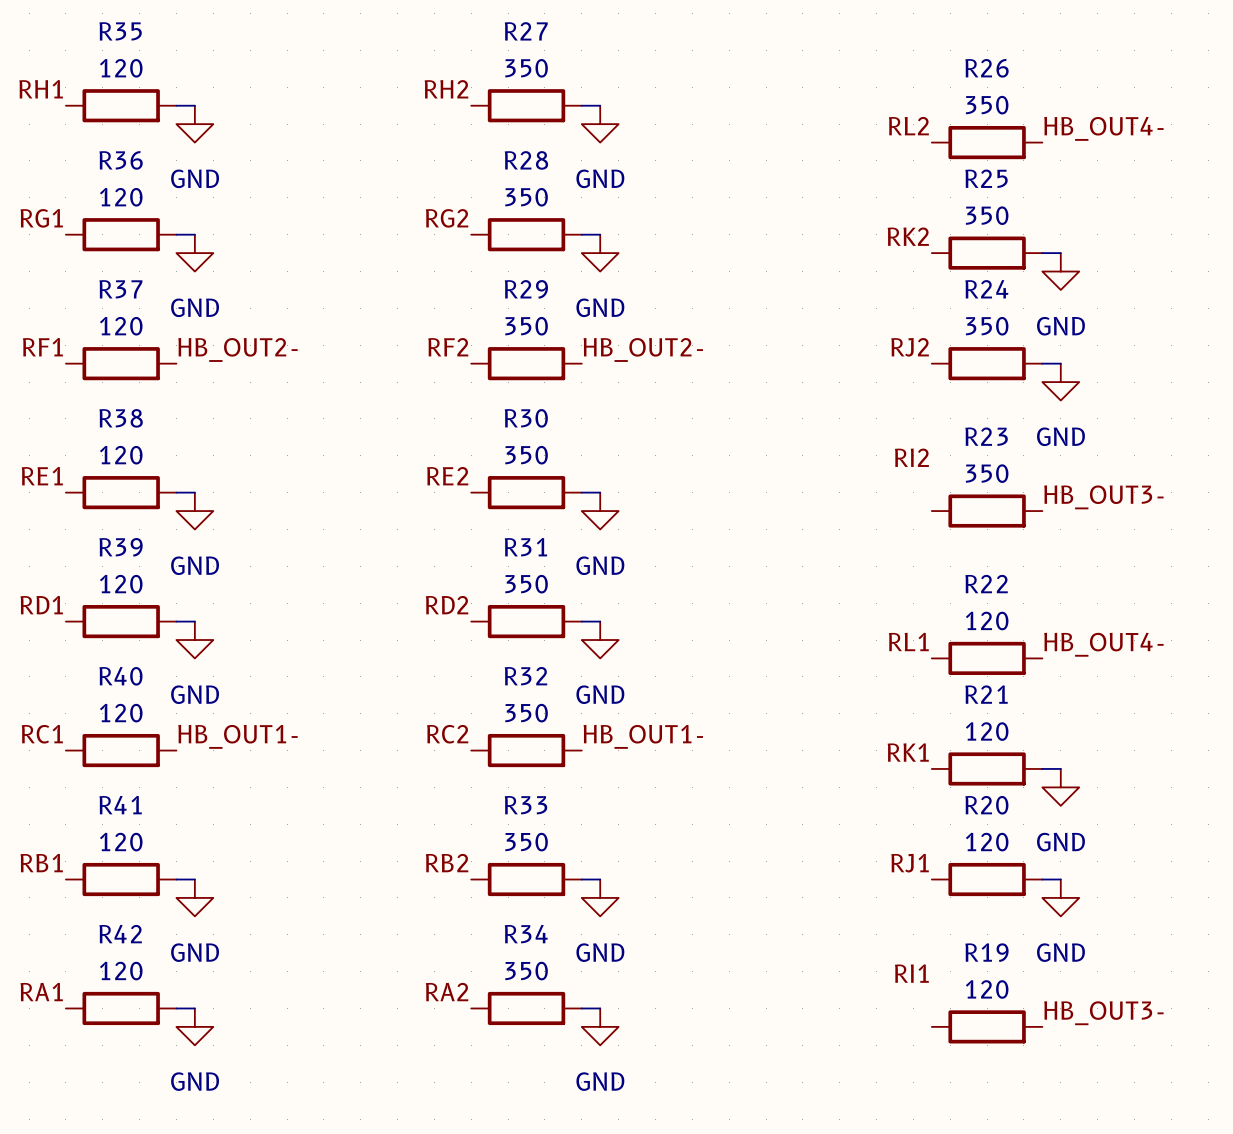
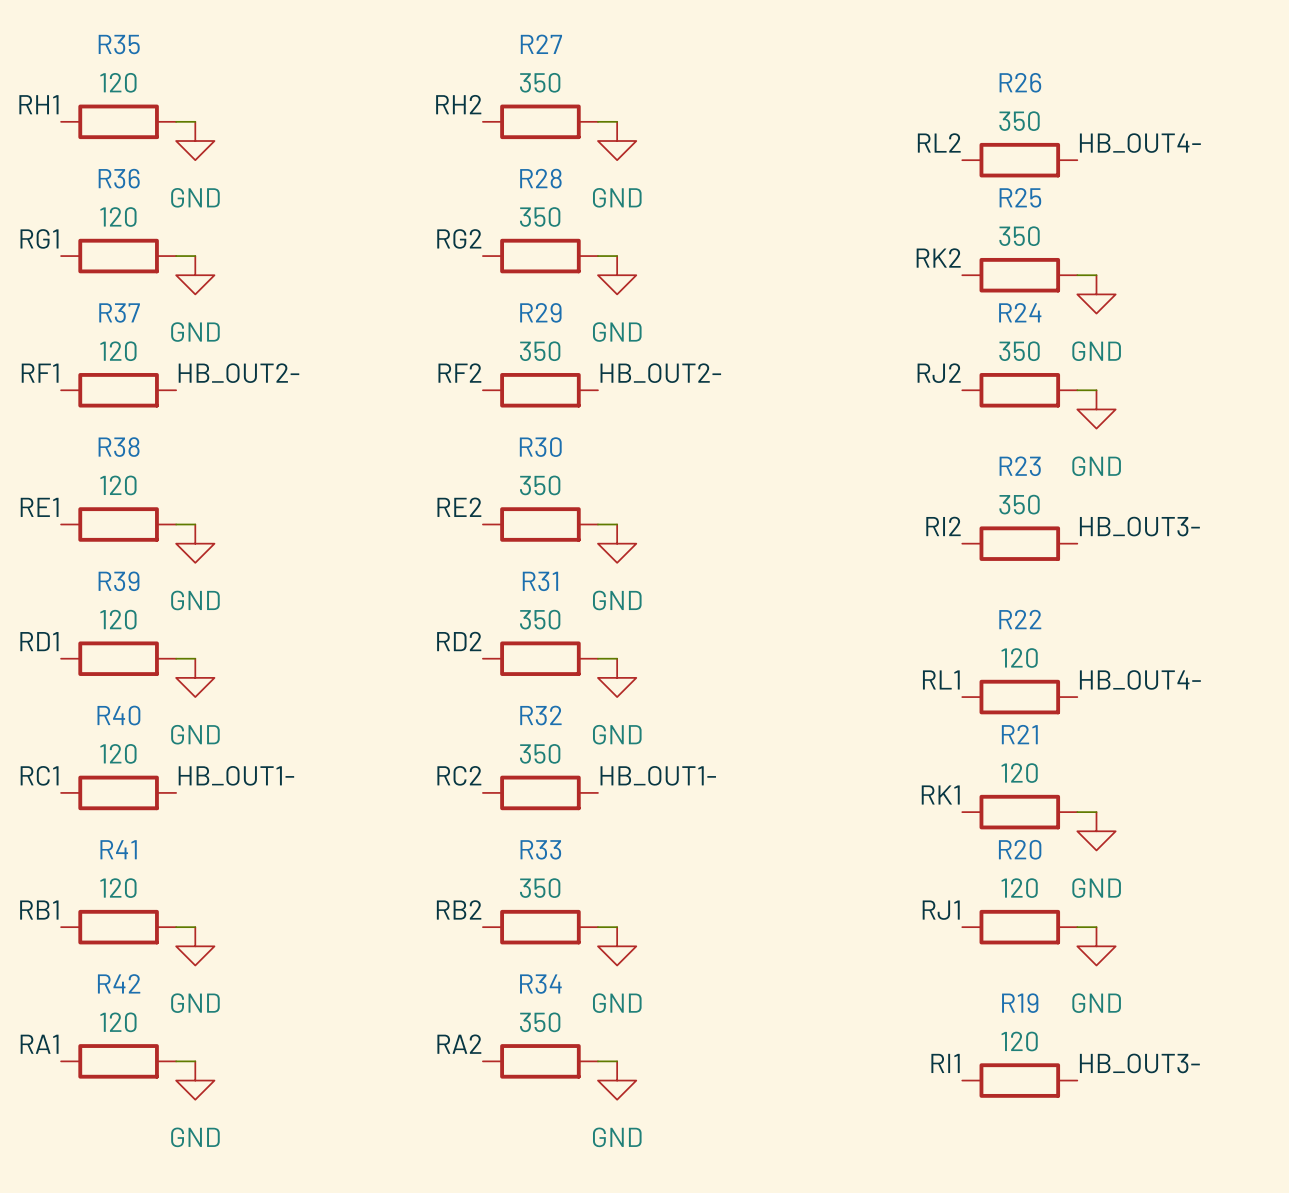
label position: RI2 (911, 457) -> RI2 (943, 526)
label position: RI1 (911, 973) -> RI1 (945, 1063)

